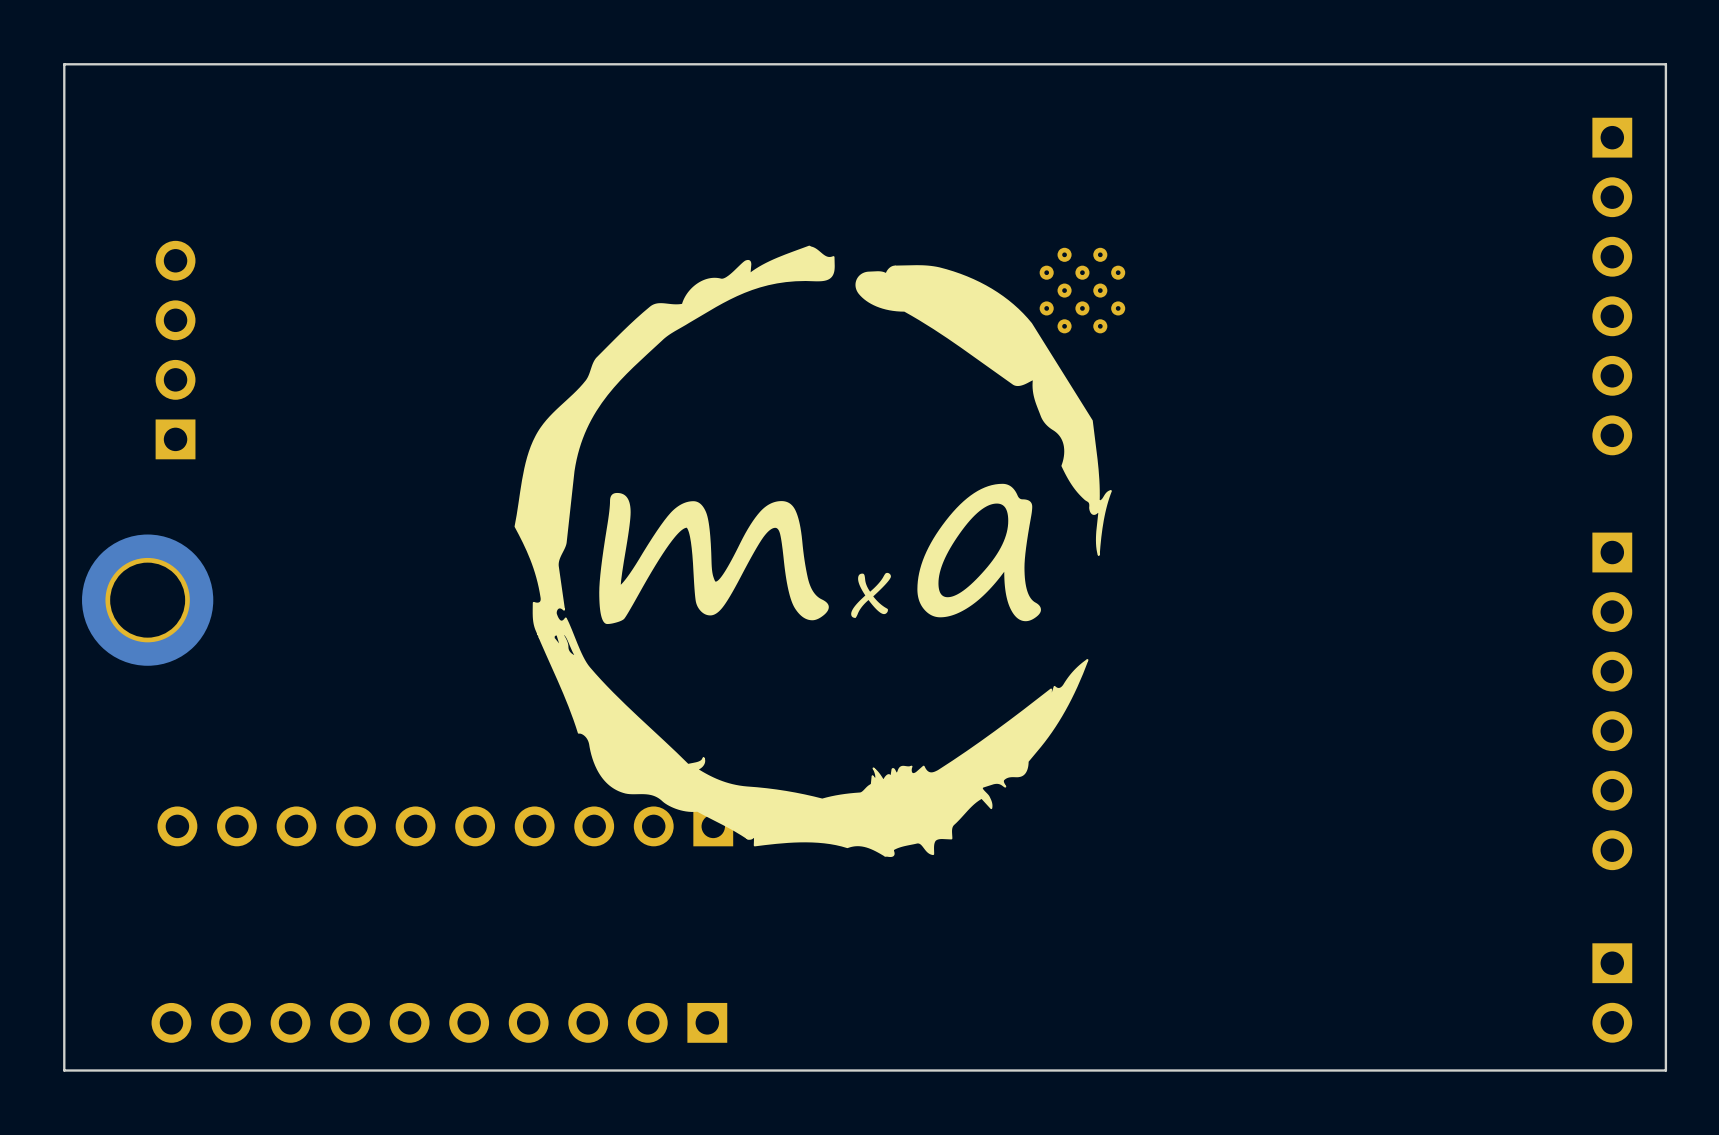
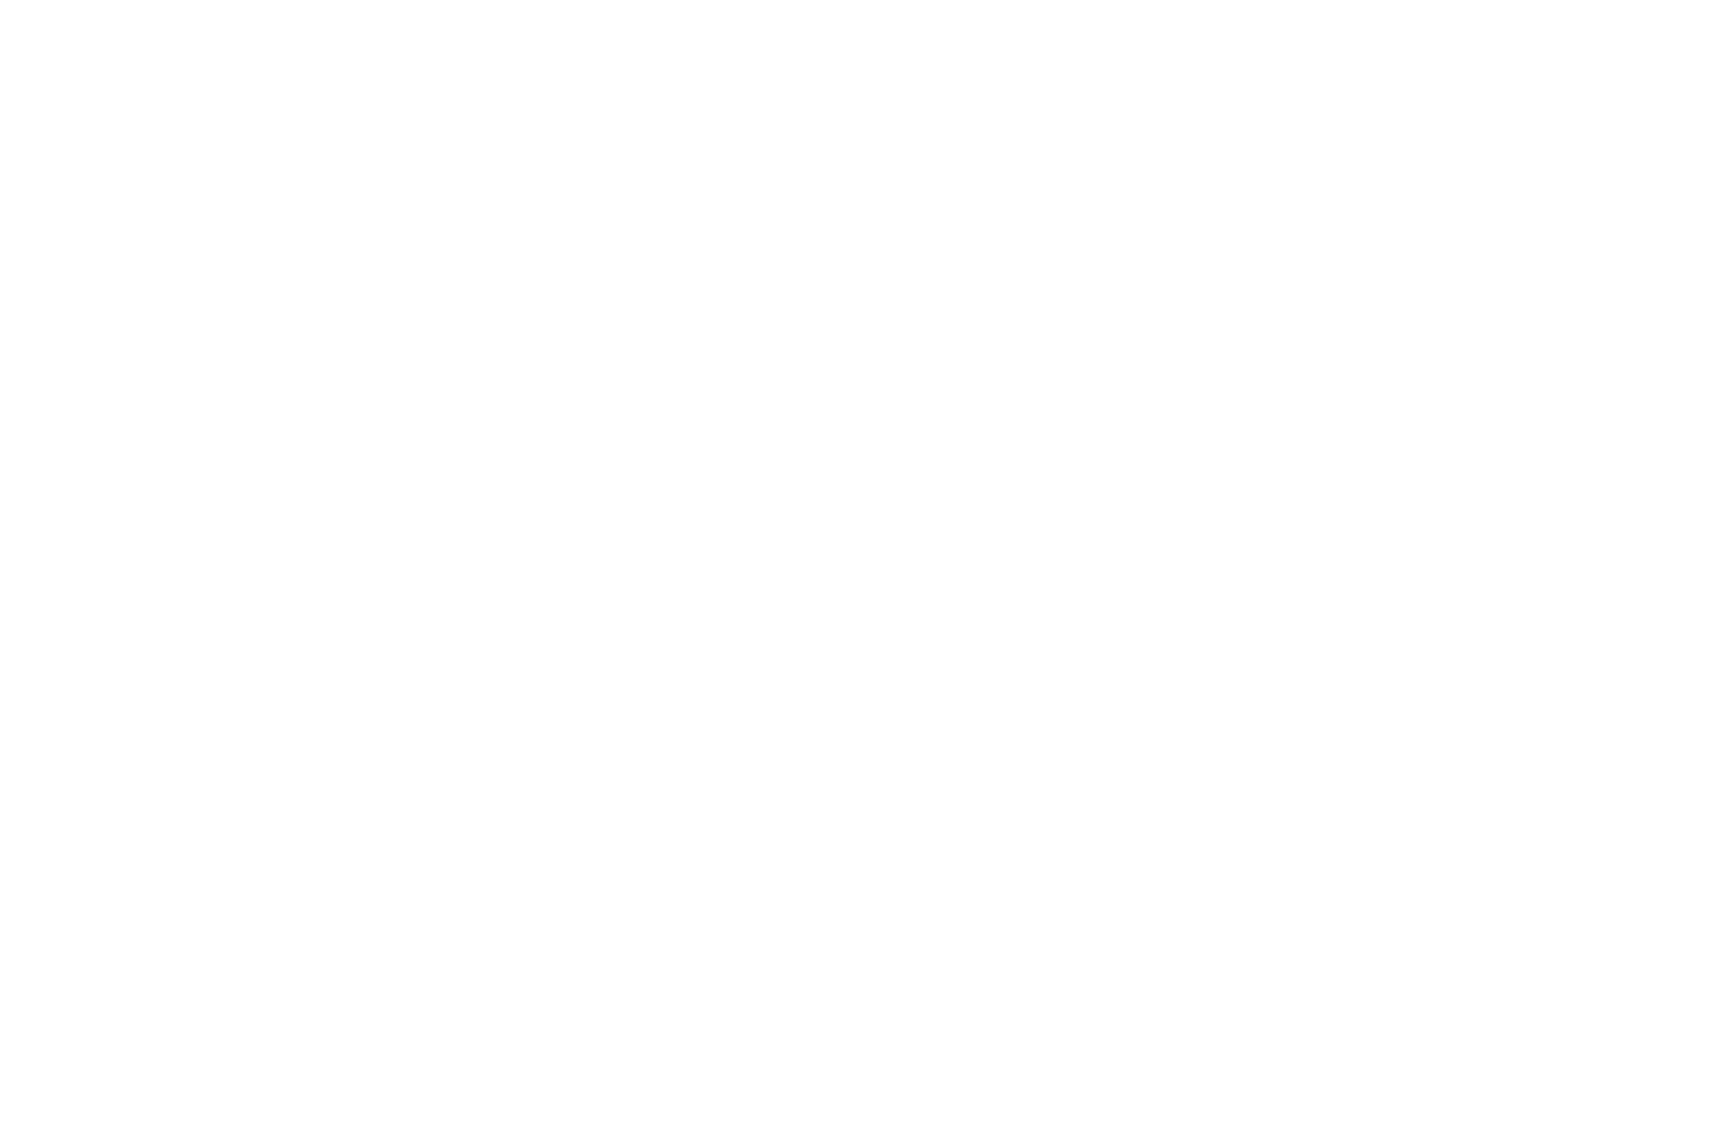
board edge: (1665, 64) (64, 64) (64, 1070) (1665, 1070) (1665, 64) -> none
drawing: [514, 245, 1112, 858] -> none
part: (1612, 286) -> none
part: (1082, 290) -> none
part: (175, 350) -> none
part: (147, 600) -> none
part: (1612, 701) -> none
part: (445, 826) -> none
part: (1612, 992) -> none
part: (439, 1022) -> none

